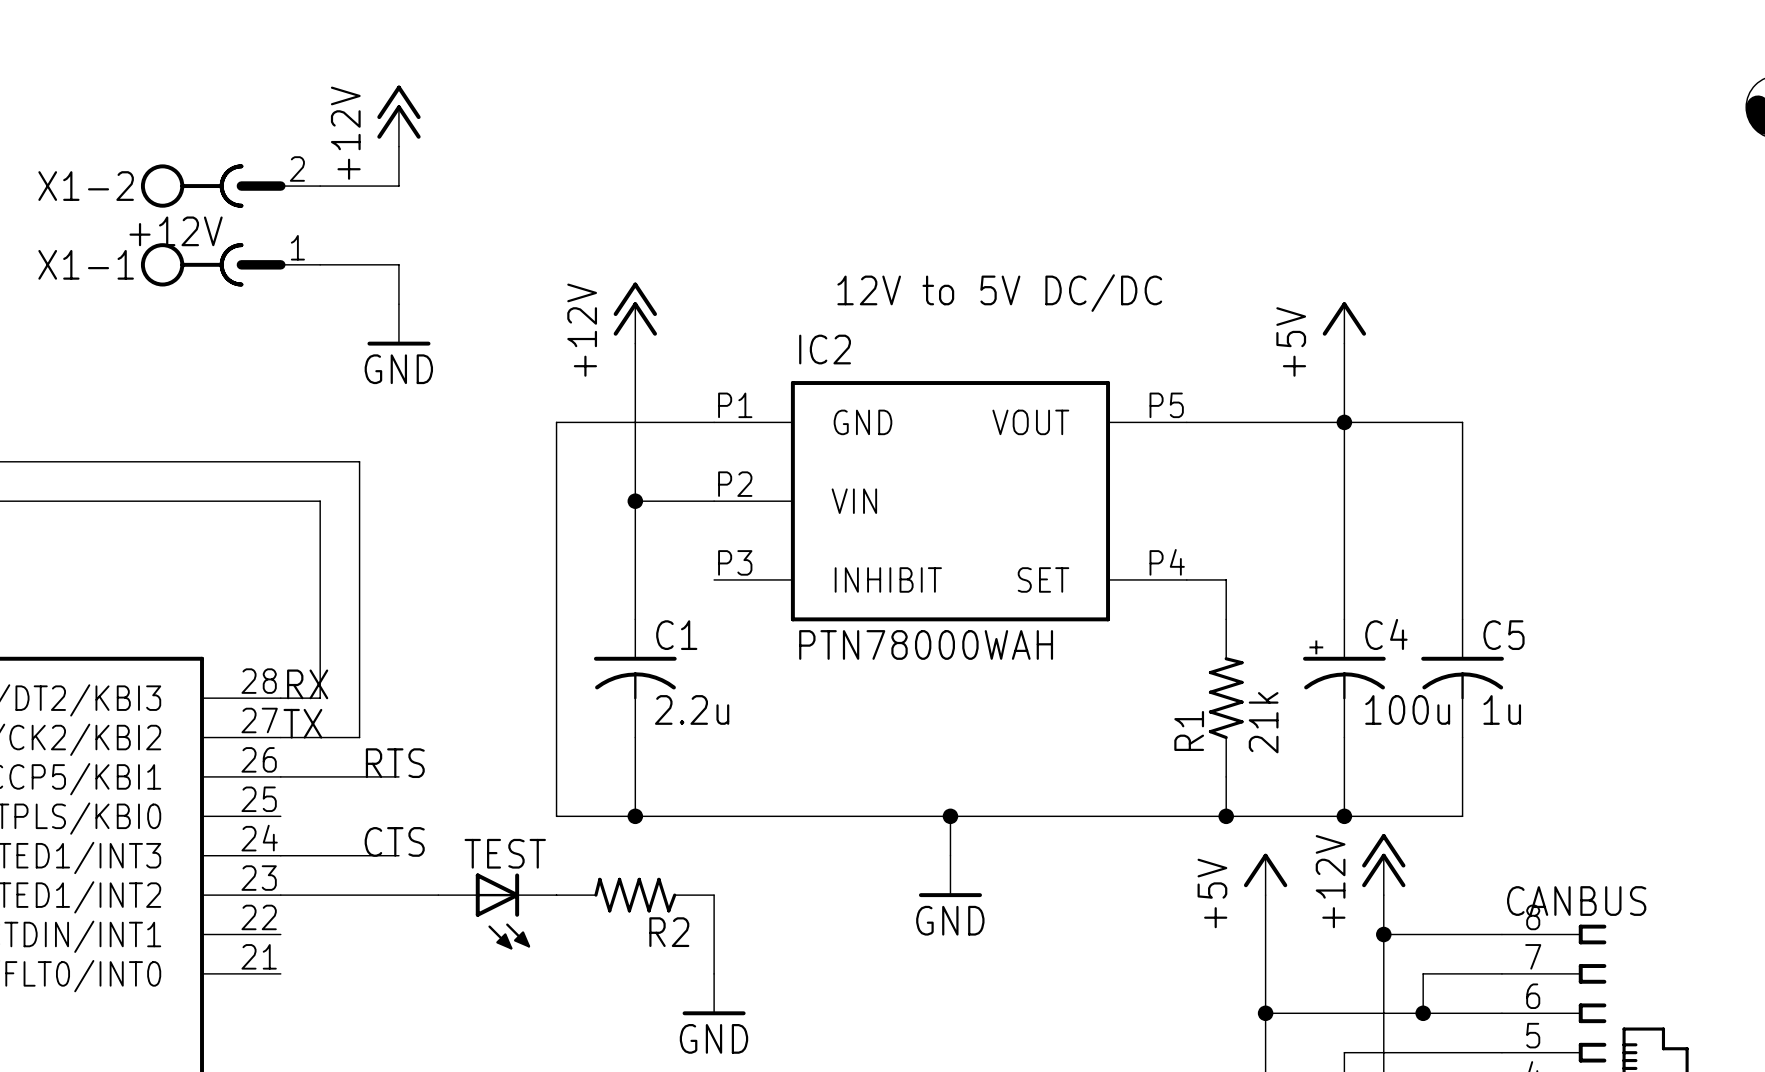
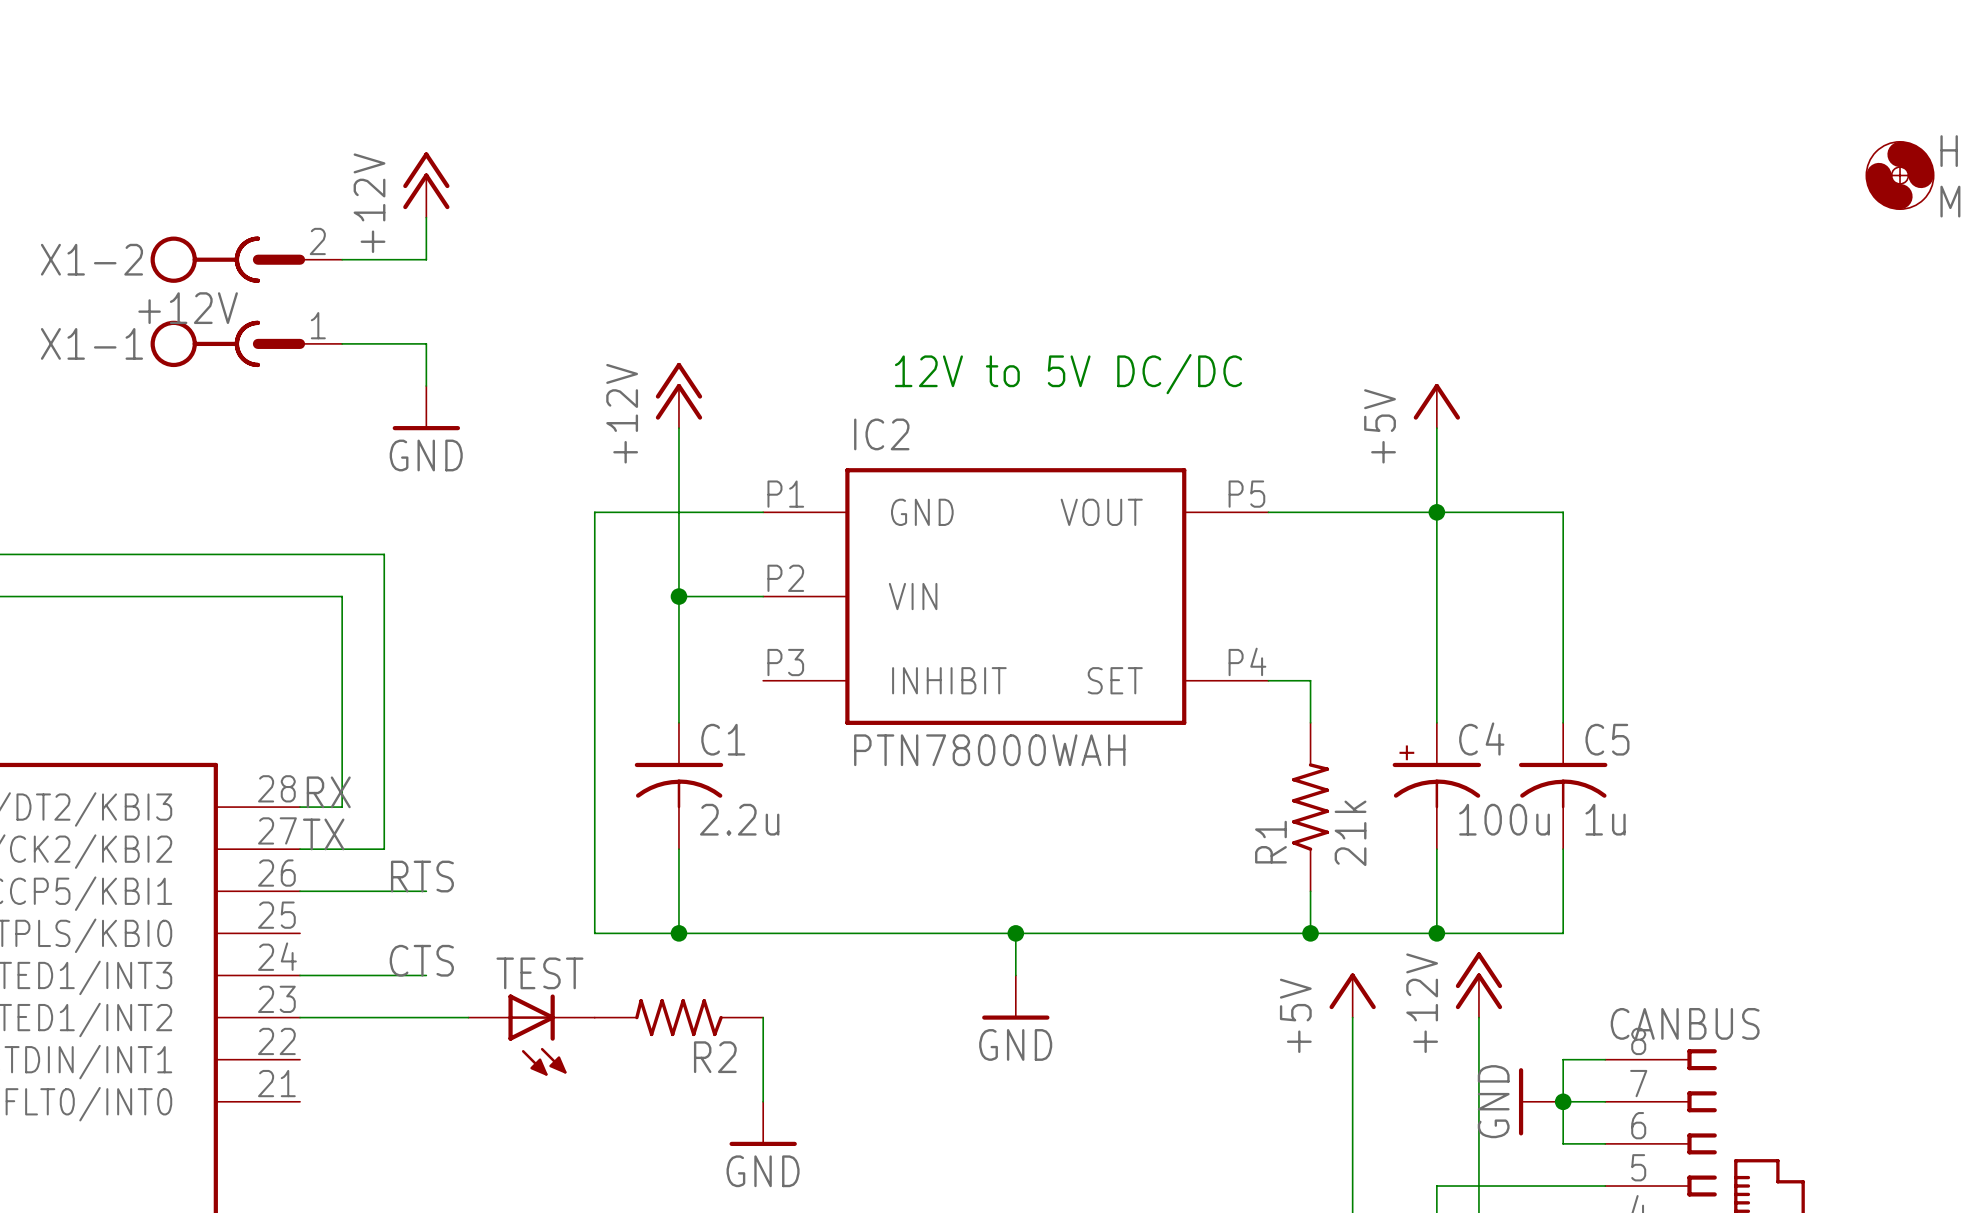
wire: (1383, 934) (1462, 934) -> (1563, 1143) (1563, 1059)
junction: (1383, 934) -> none
power symbol: none -> GND (1541, 1101)
junction: none -> (1563, 1101)
wire: (1265, 1013) (1462, 1013) -> none
junction: (1265, 1013) -> none
junction: (1423, 1013) -> none

